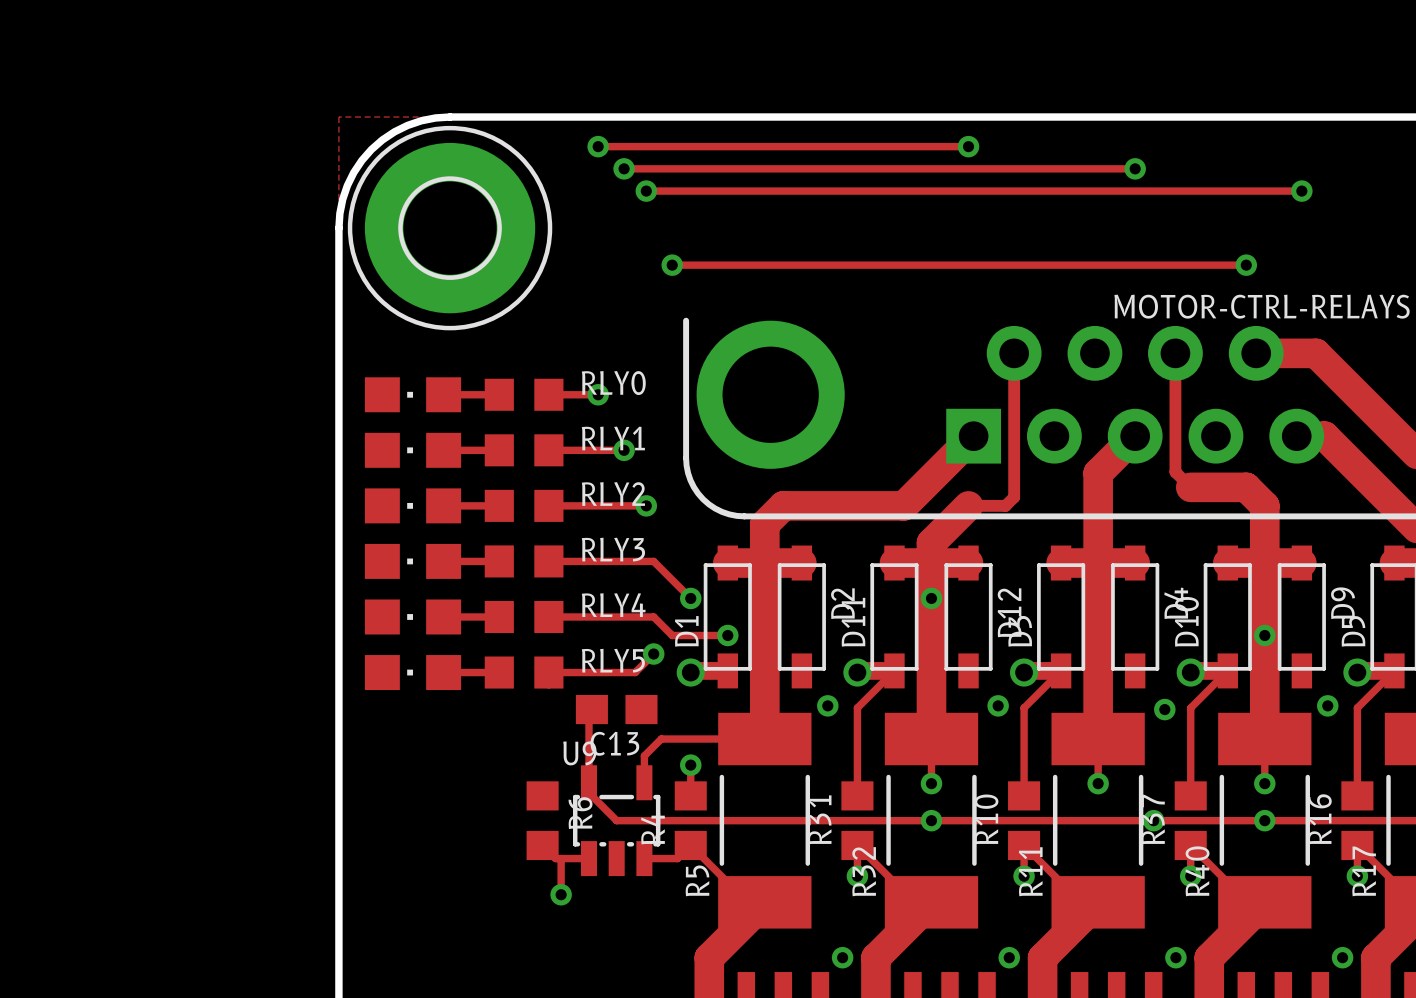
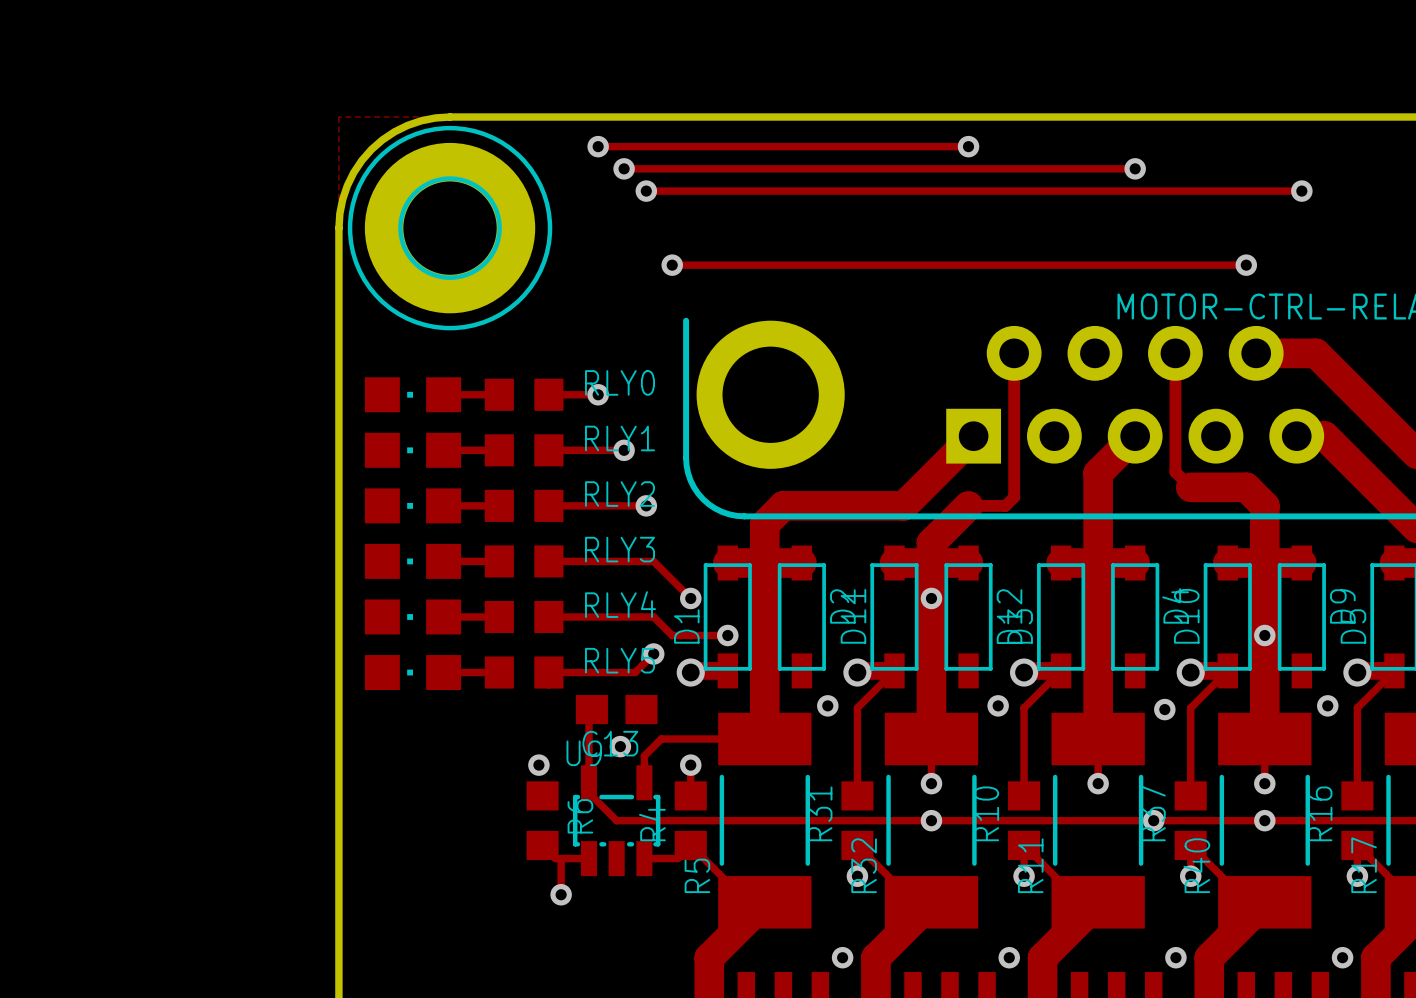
via: none -> (620, 746)
via: none -> (538, 765)

